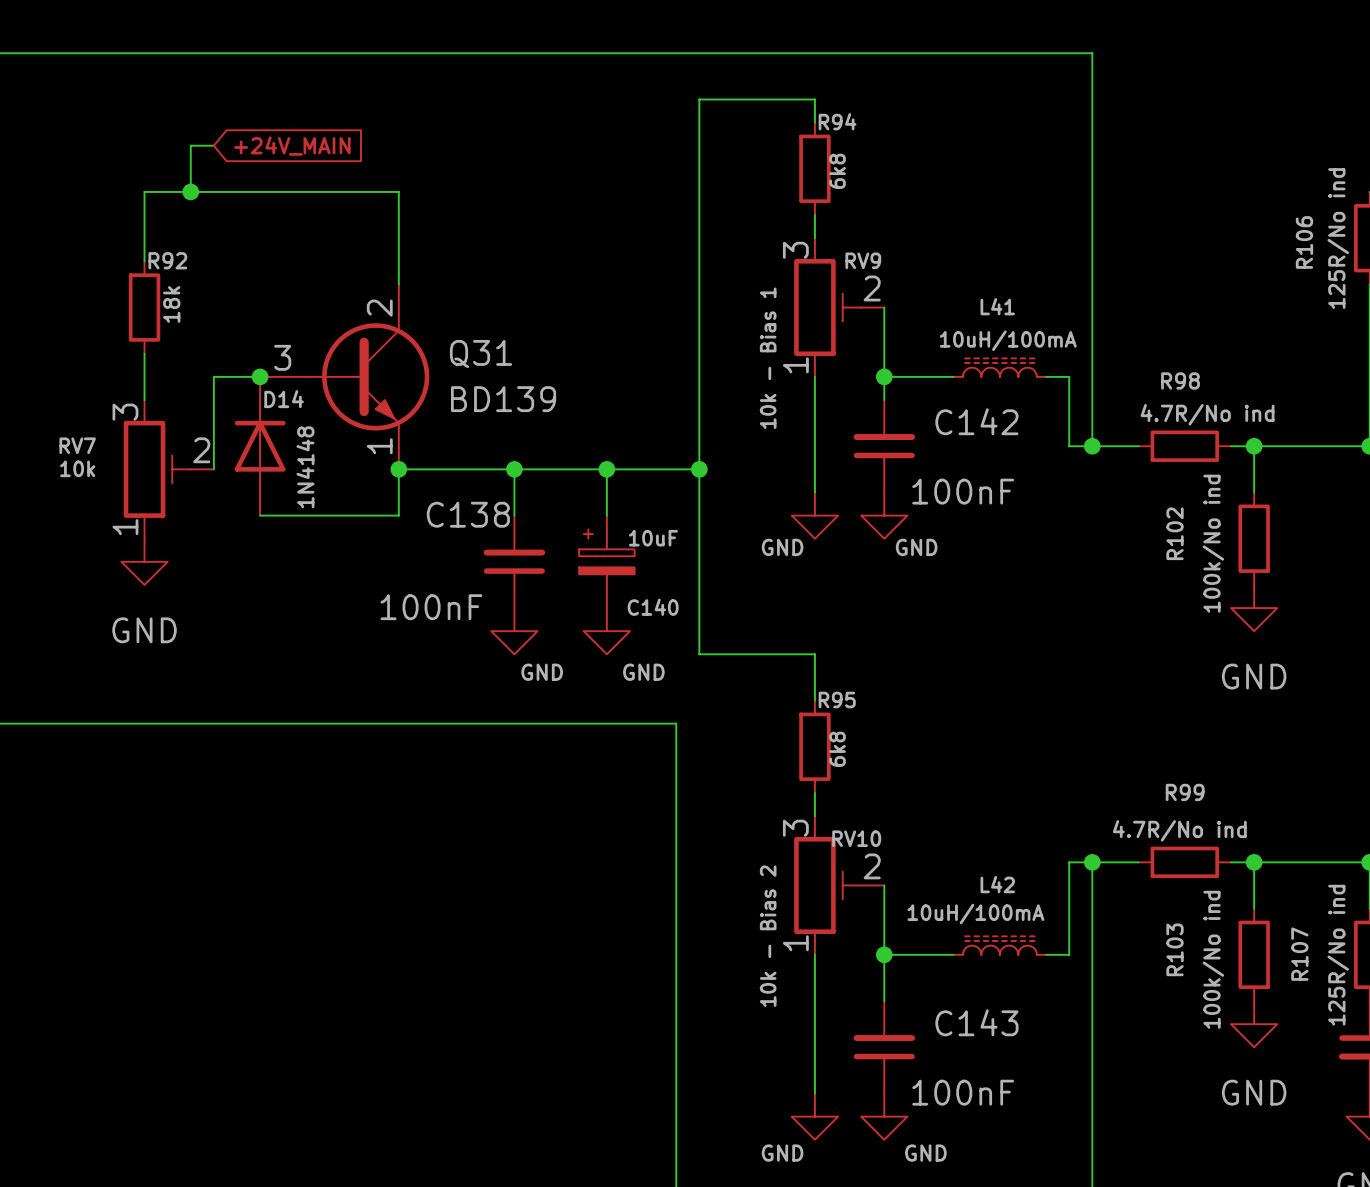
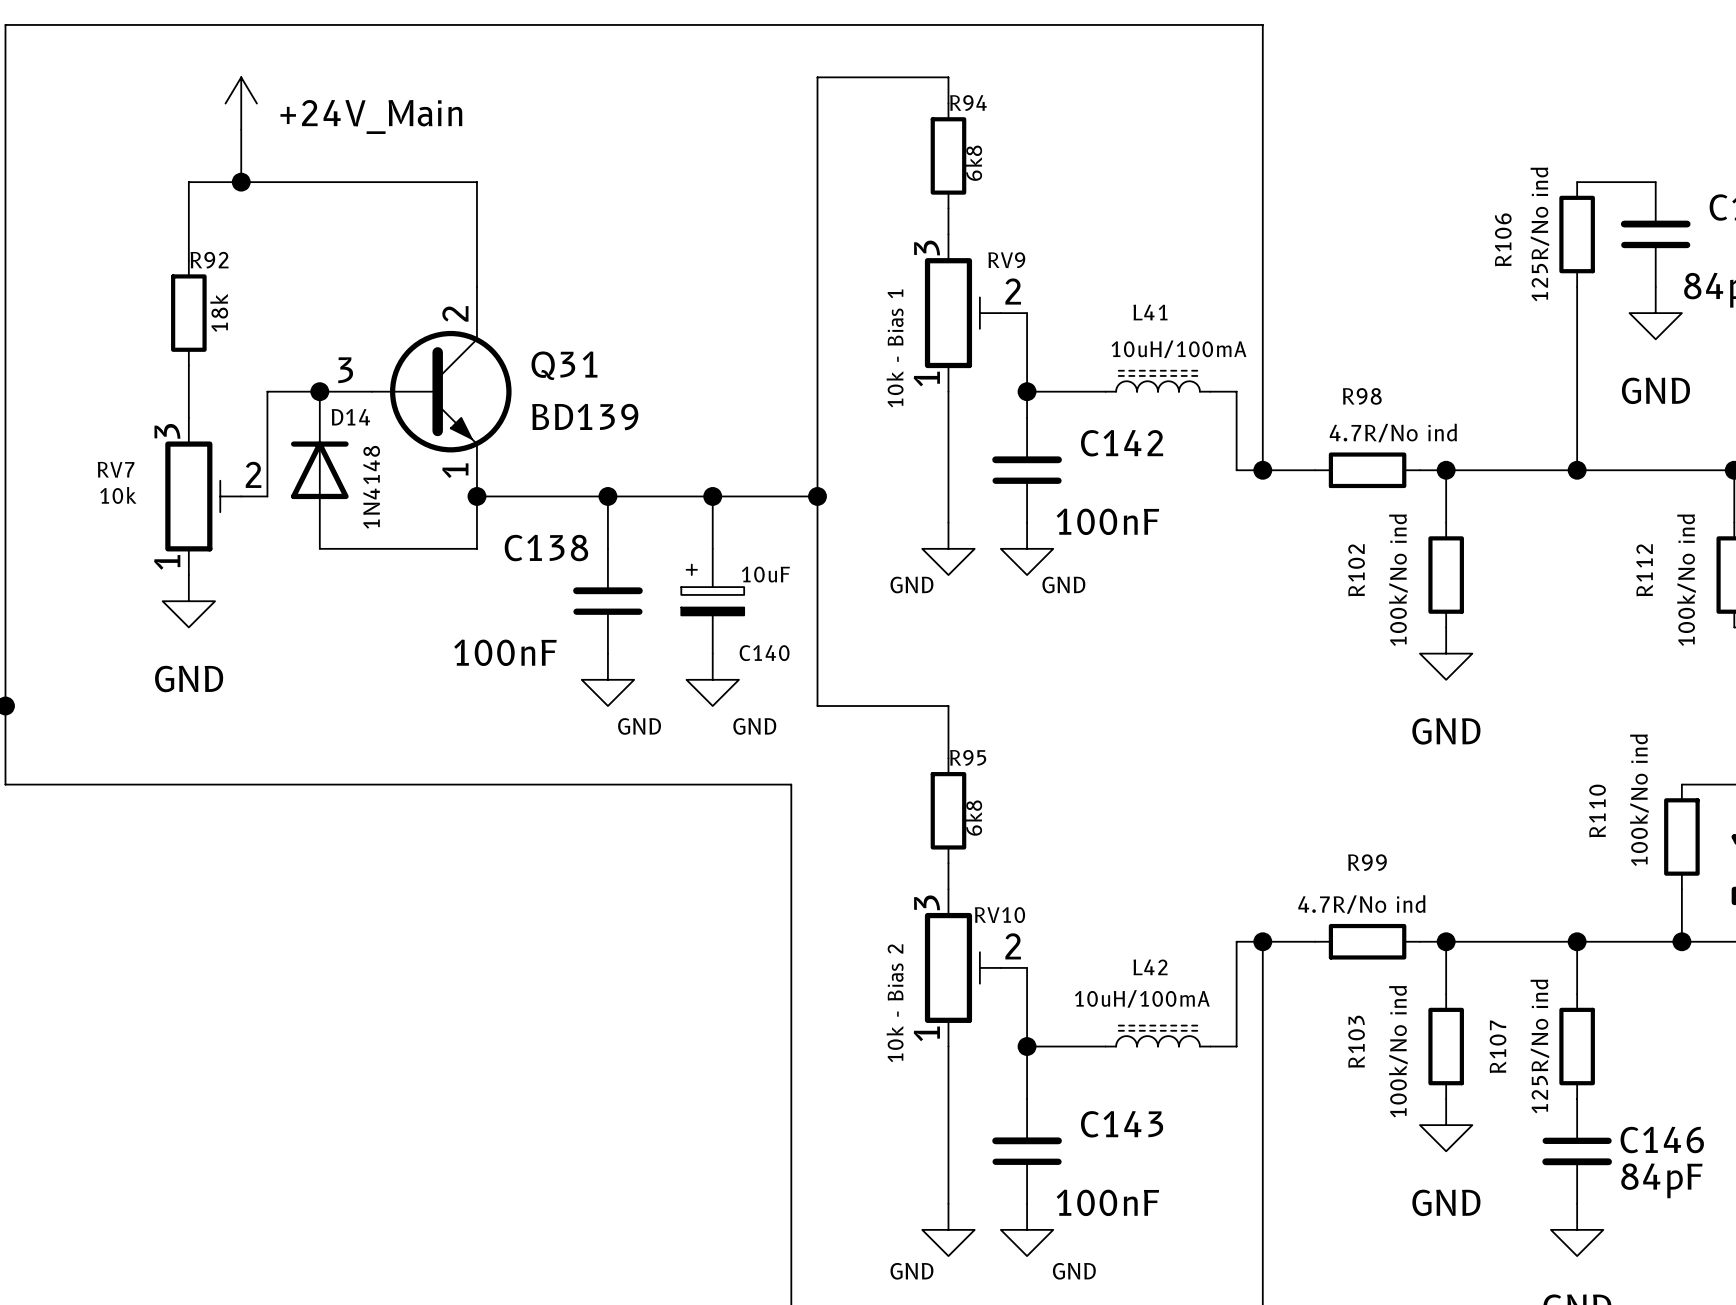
power symbol: none -> +24V_Main (241, 103)
wire: (190, 145) (213, 145) -> none
global label: +24V_MAIN (292, 146) -> none

